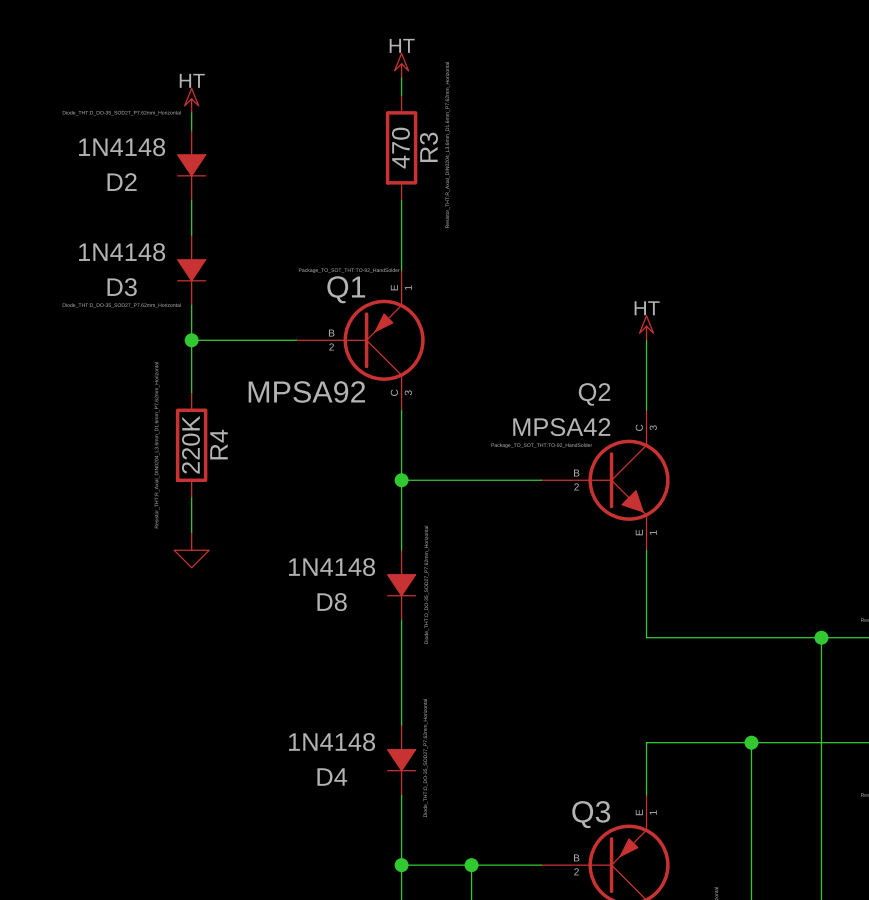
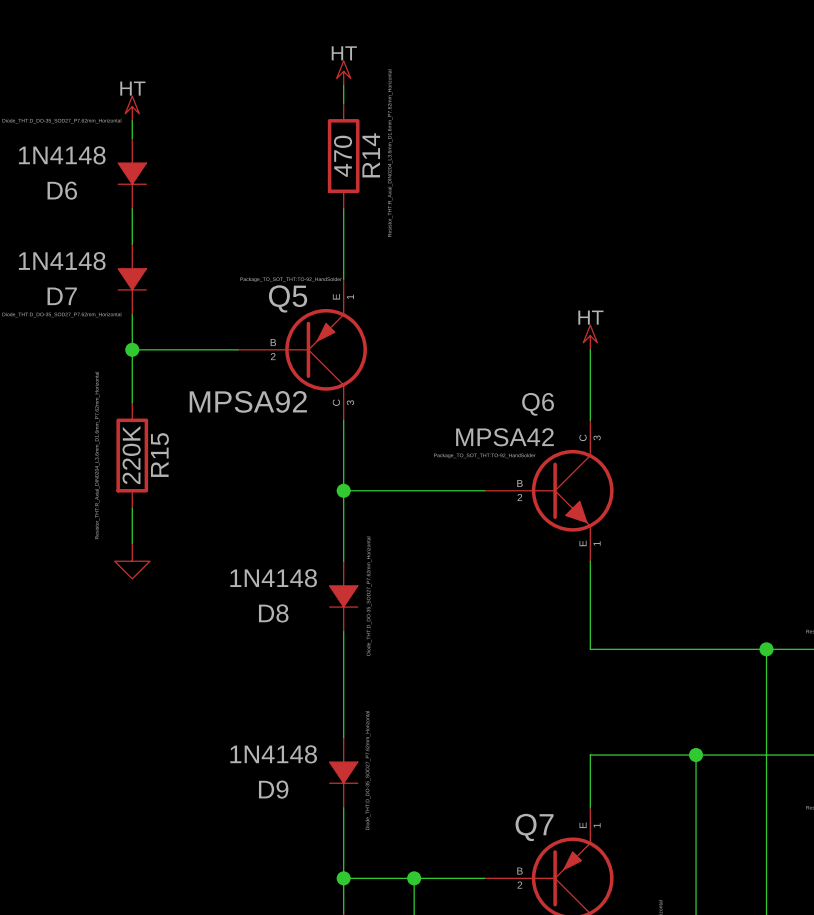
R3 name: R3 (428, 147) -> R14 (371, 155)
D2 name: D2 (122, 182) -> D6 (62, 190)
D3 name: D3 (122, 287) -> D7 (62, 296)
Q1 name: Q1 (346, 289) -> Q5 (288, 298)
Q2 name: Q2 (594, 394) -> Q6 (538, 404)
R4 name: R4 (218, 444) -> R15 (159, 455)
D4 name: D4 (332, 777) -> D9 (273, 789)
Q3 name: Q3 (591, 814) -> Q7 (534, 827)

